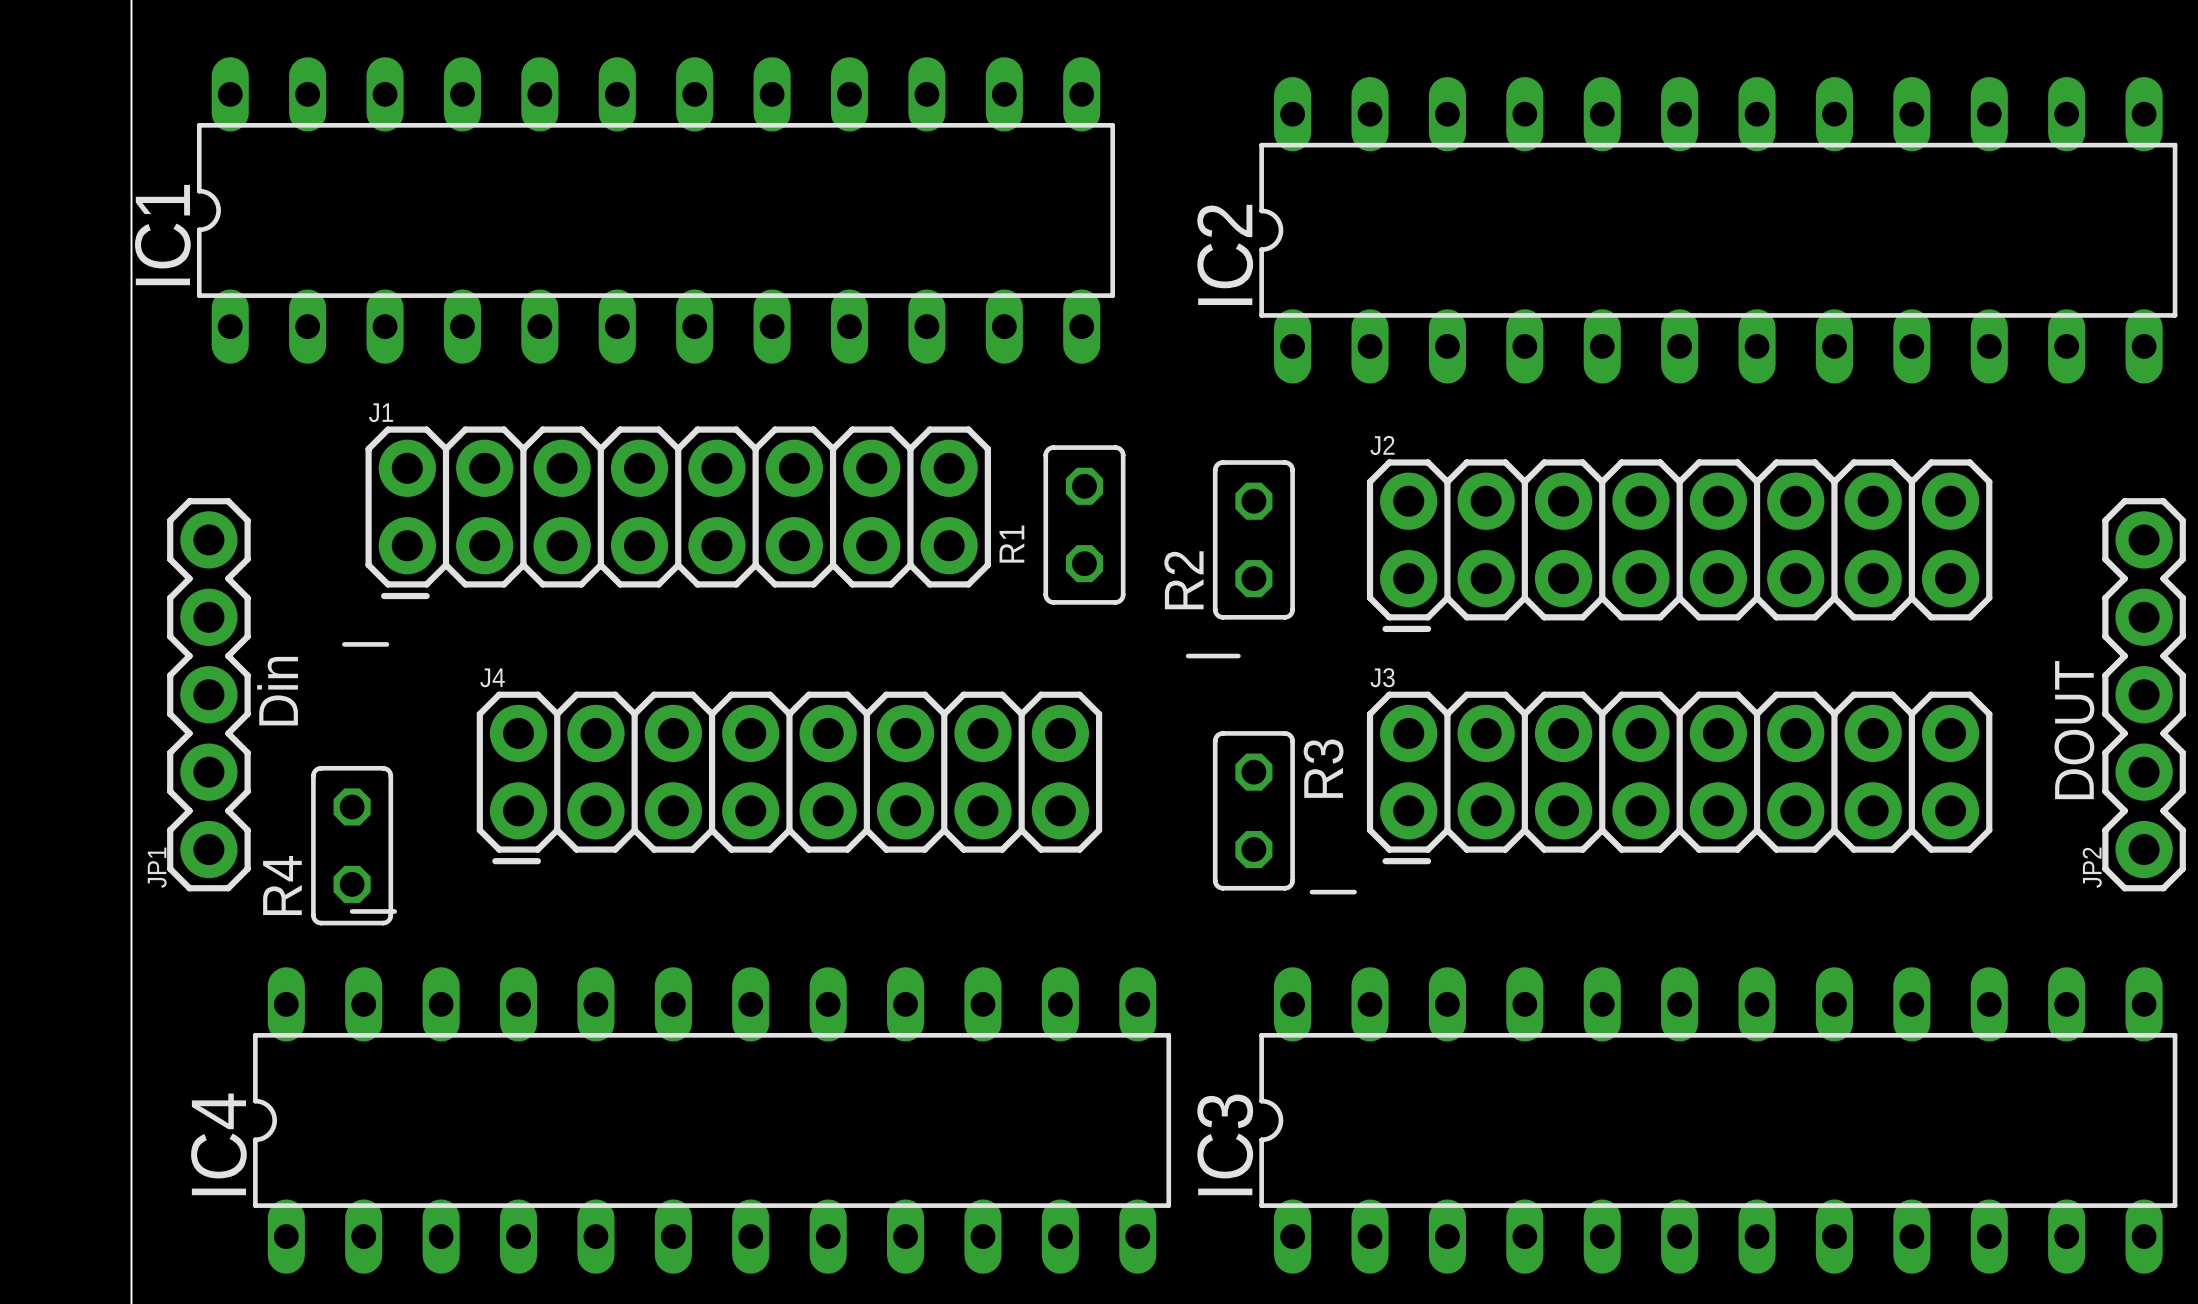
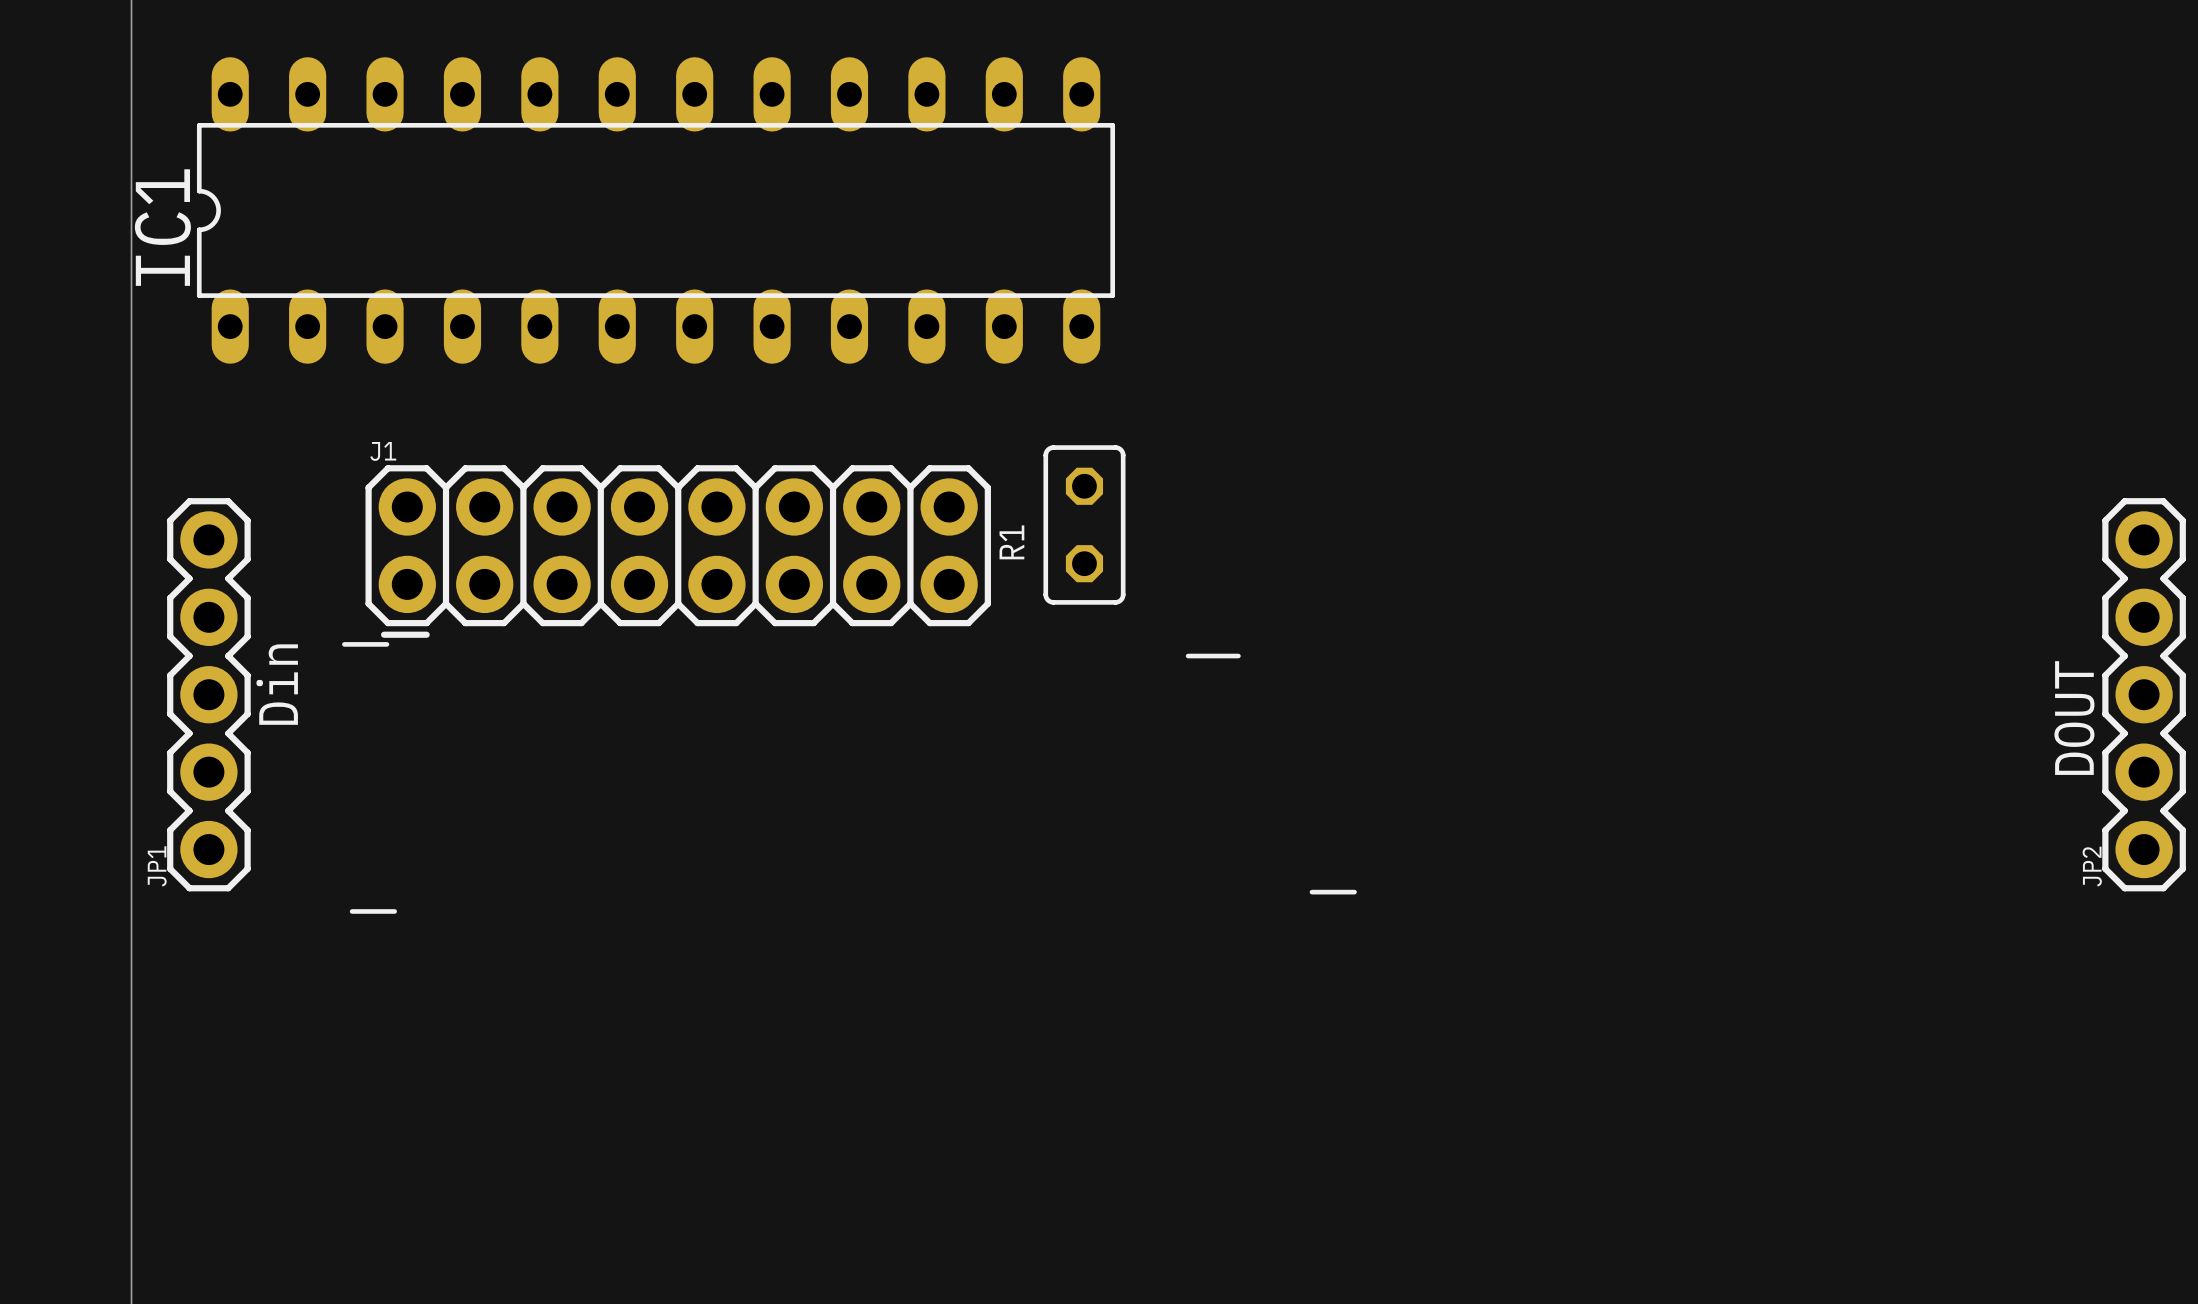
IC2: (1718, 230) -> none
J1 position: (678, 512) -> (678, 551)
R2: (1253, 539) -> none
J2: (1679, 545) -> none
J4: (789, 777) -> none
J3: (1679, 777) -> none
R3: (1253, 810) -> none
R4: (352, 845) -> none
IC4: (712, 1120) -> none
IC3: (1718, 1120) -> none

